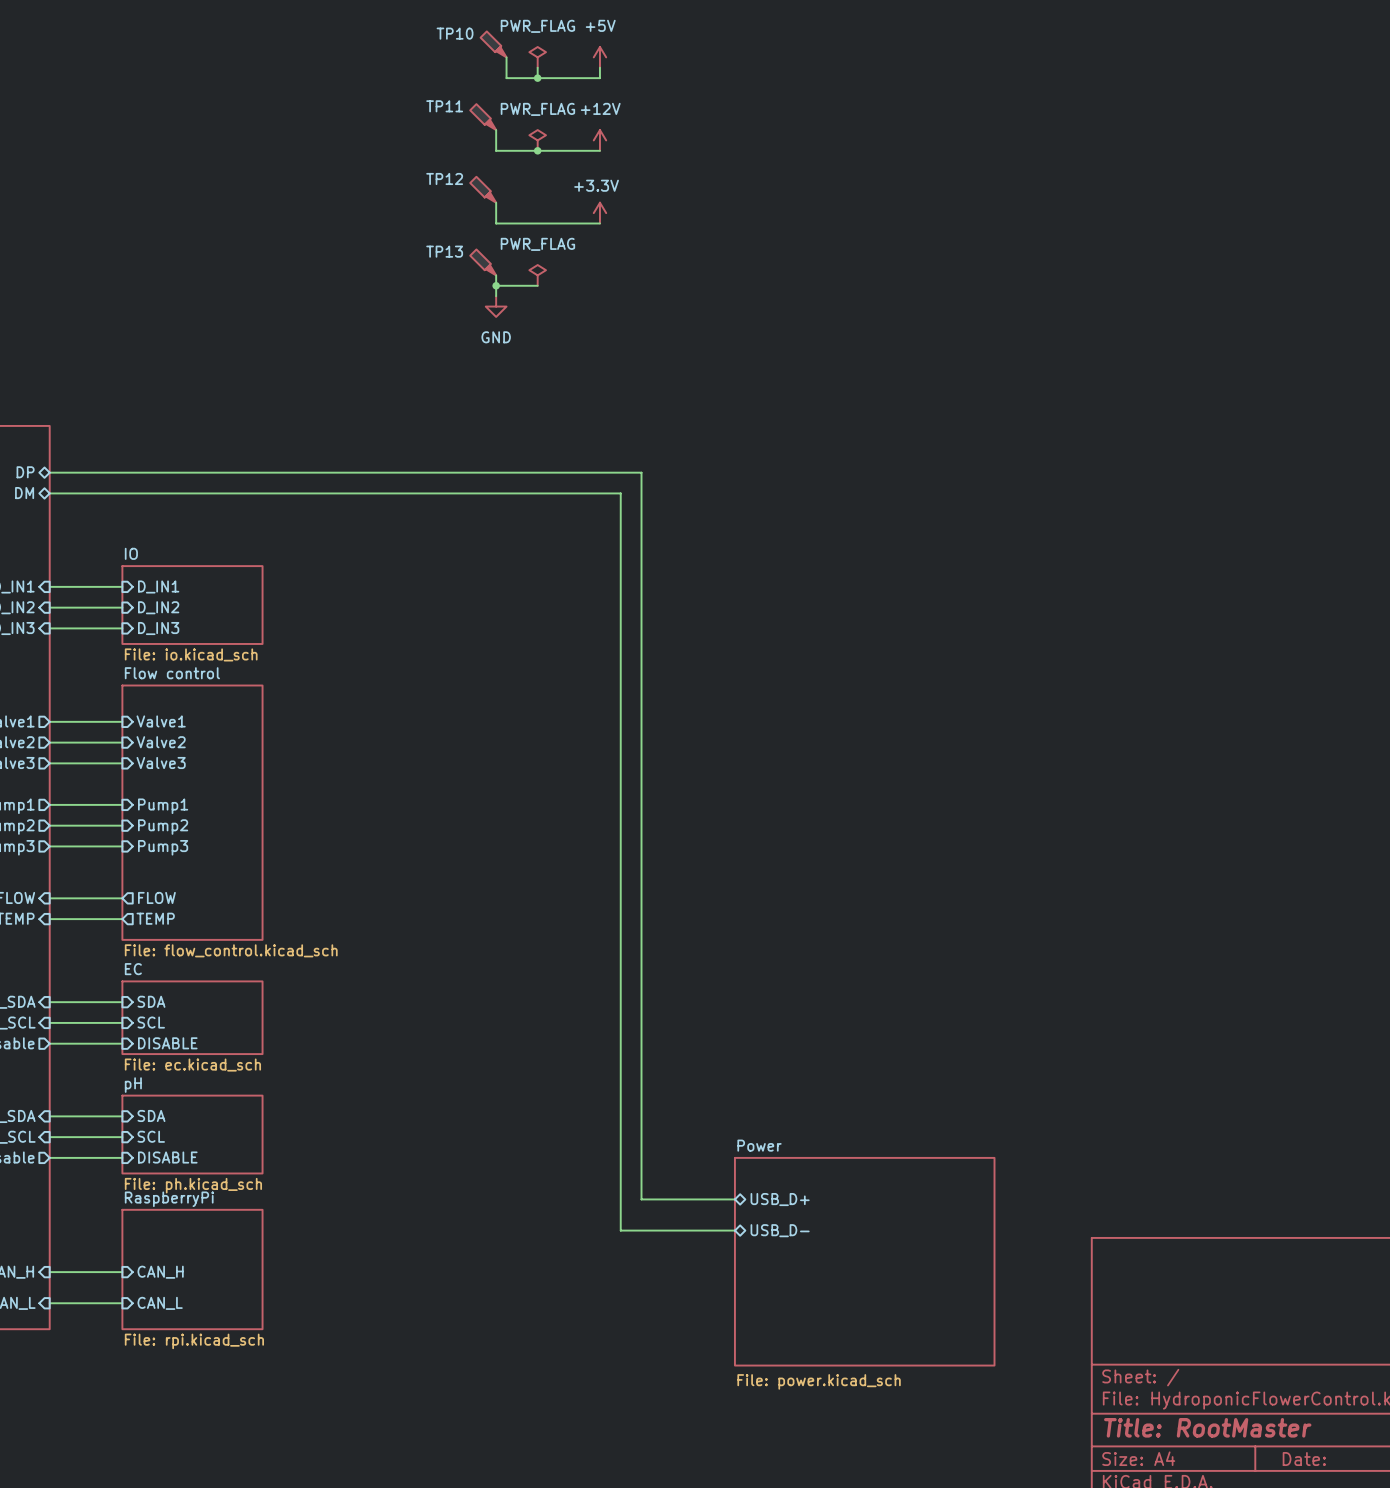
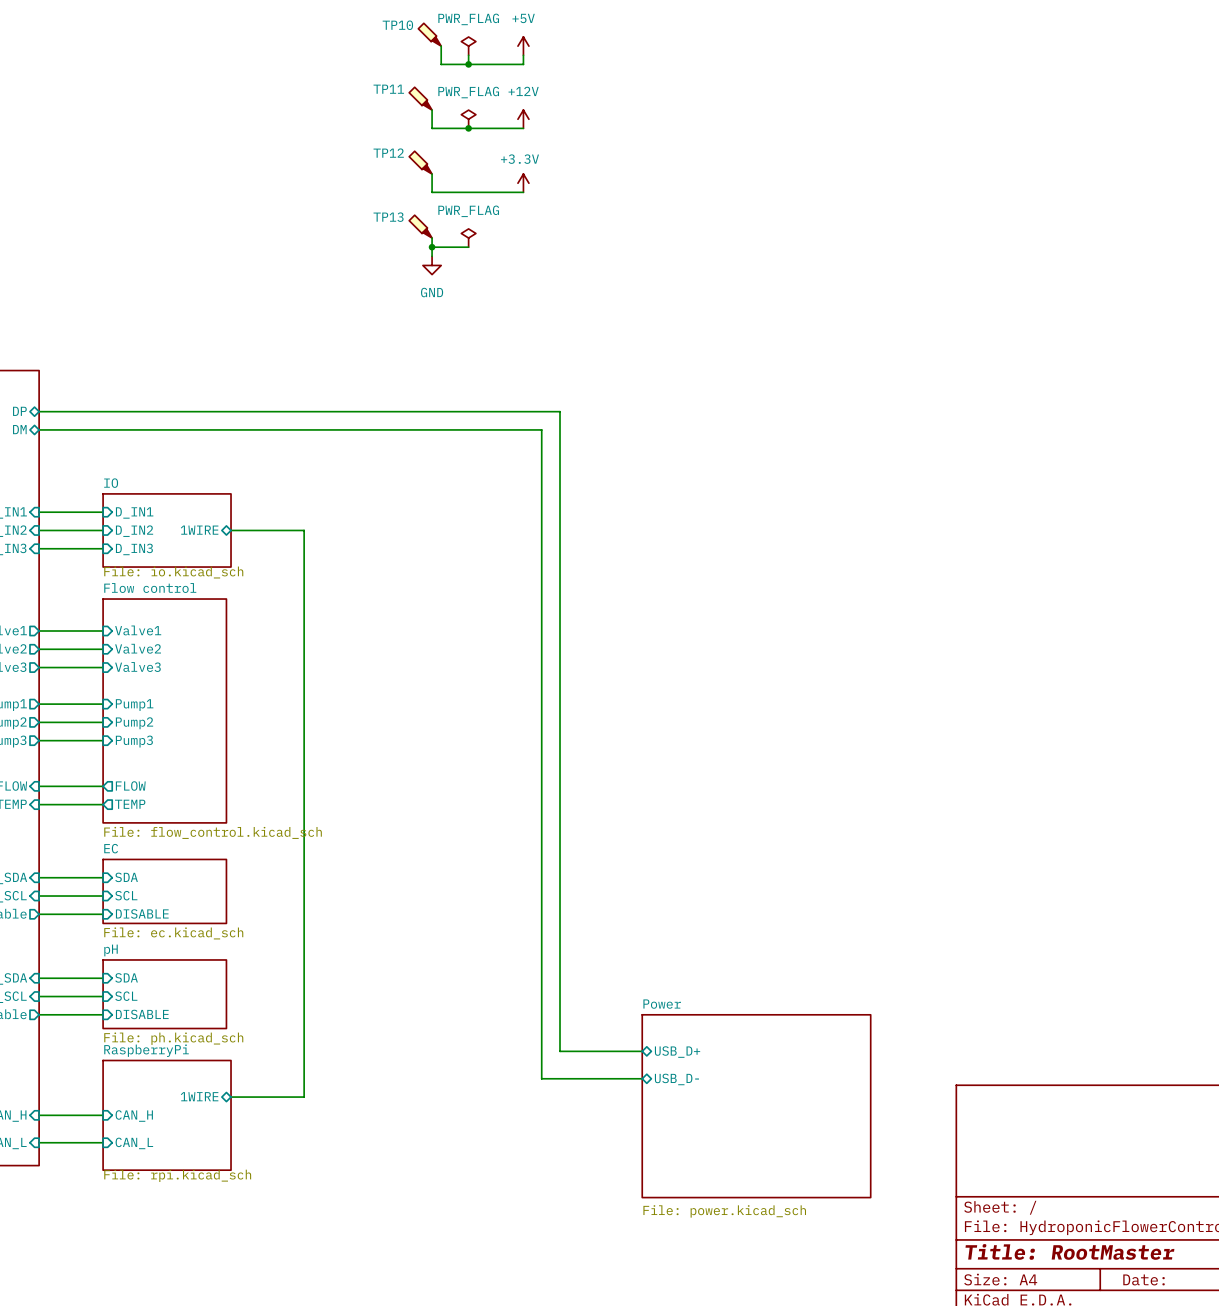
sheet IO shape: [121, 565, 264, 645] -> [102, 493, 232, 568]
sheet pin: none -> 1WIRE (199, 530)
wire: none -> (231, 530) (304, 530) (304, 1097) (231, 1097)
sheet RaspberryPi shape: [121, 1209, 264, 1330] -> [102, 1059, 232, 1171]
sheet pin: none -> 1WIRE (199, 1096)

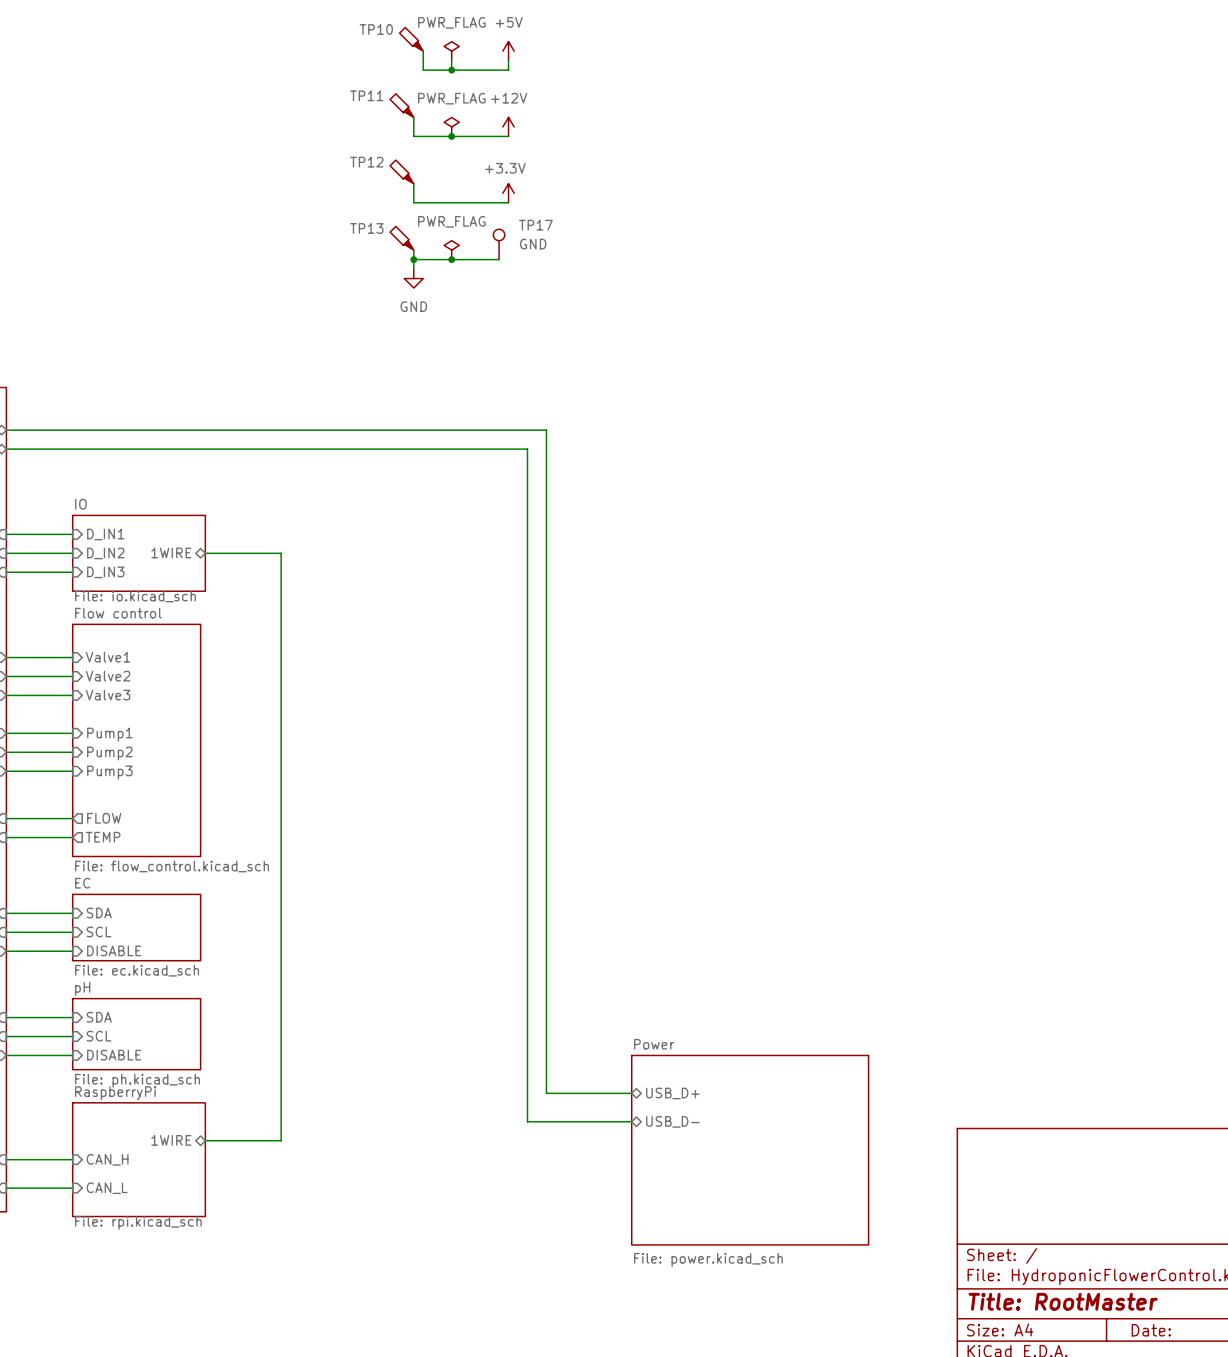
TP17: none -> GND (499, 244)
wire: none -> (451, 259) (499, 259)
junction: none -> (451, 259)

